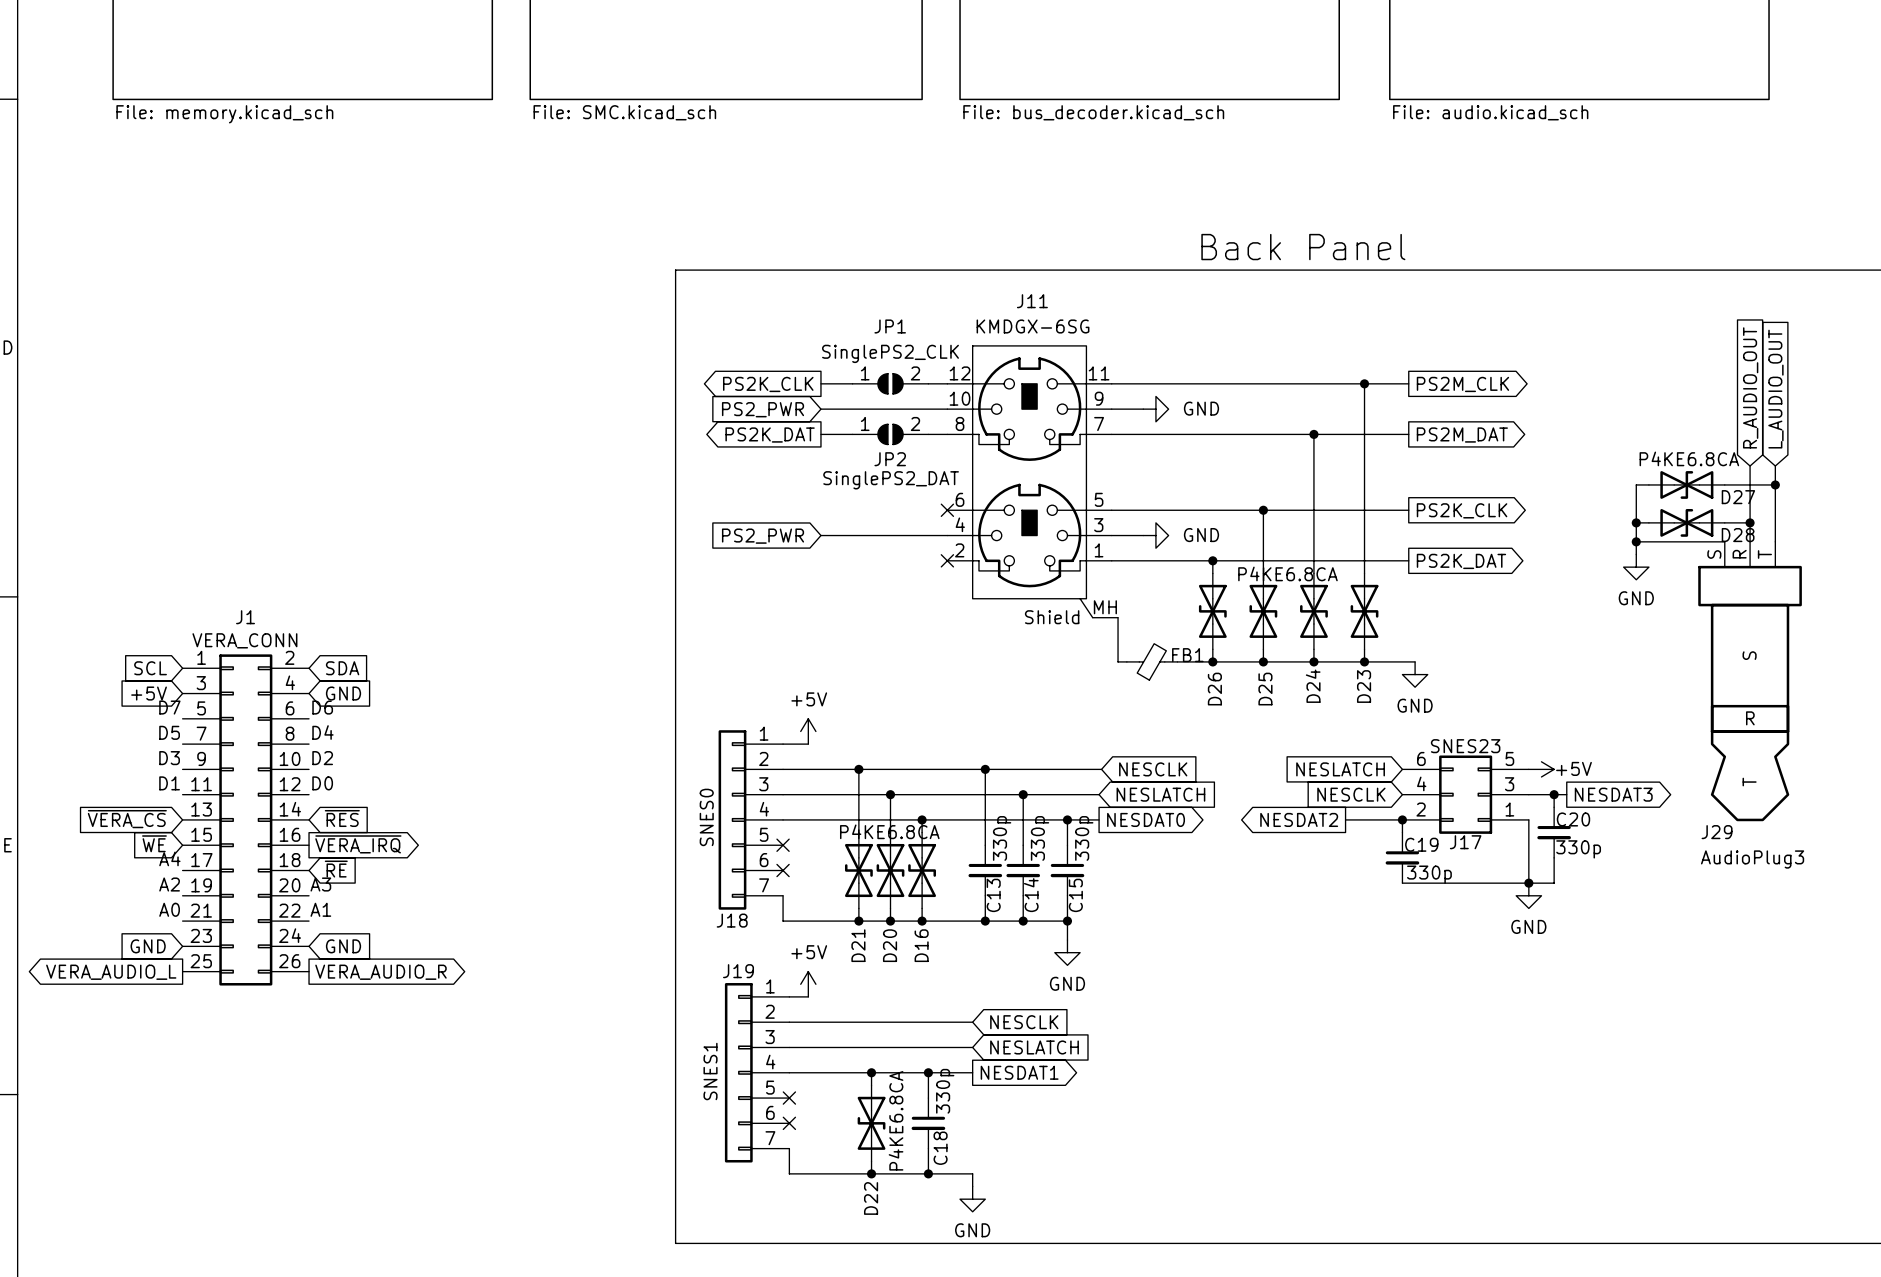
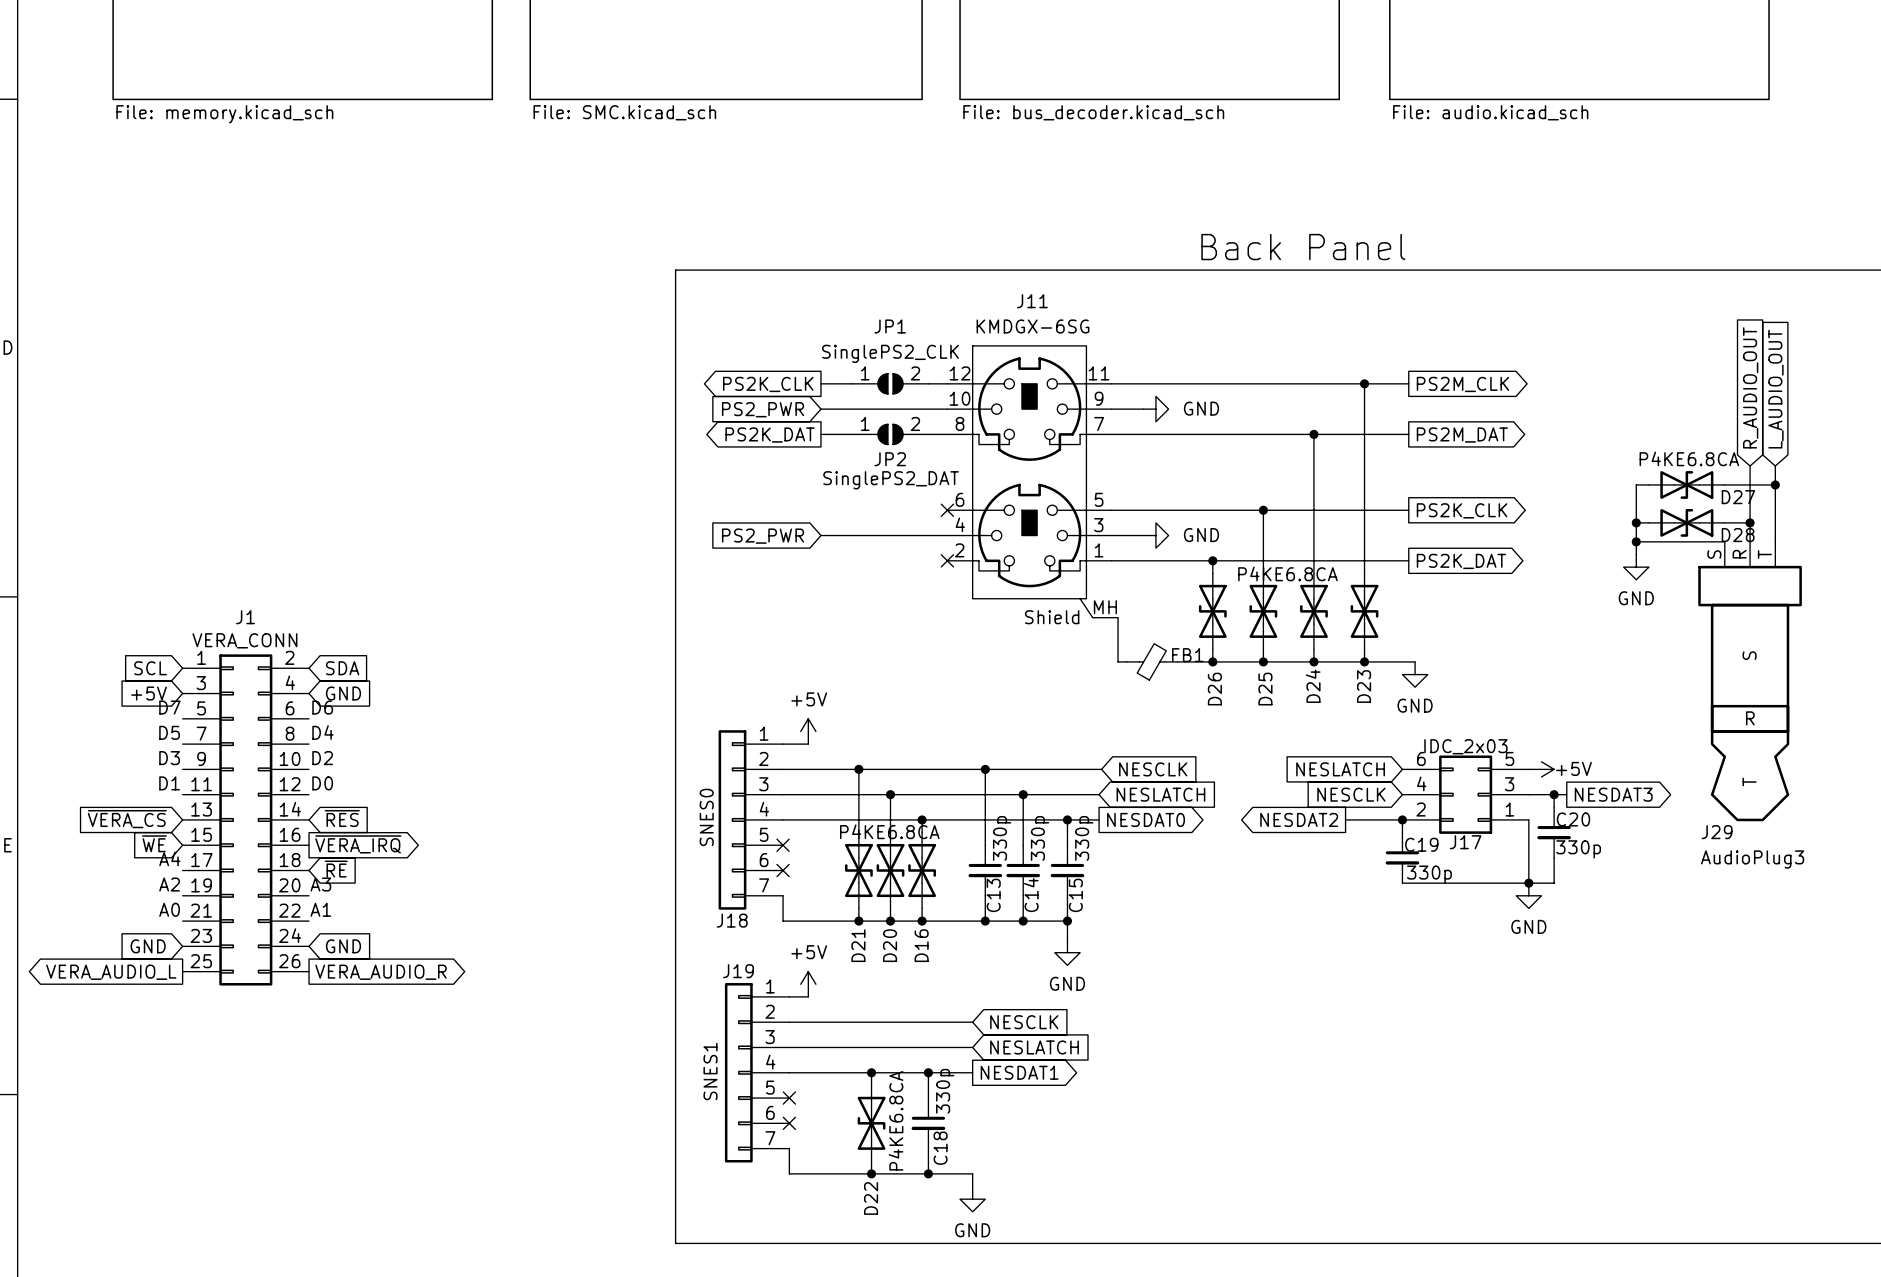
J17 value: SNES23 (1465, 746) -> IDC_2x03 (1465, 746)

